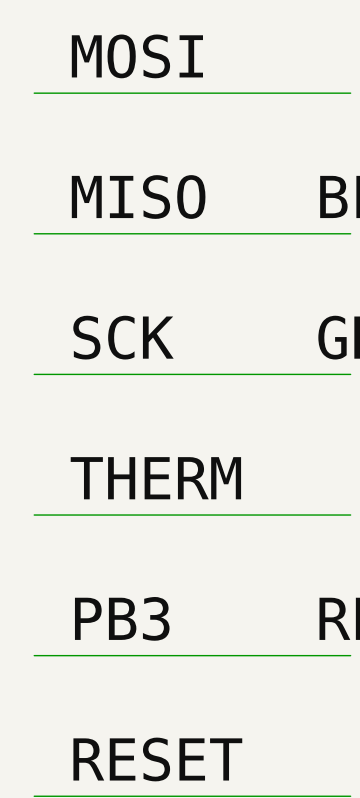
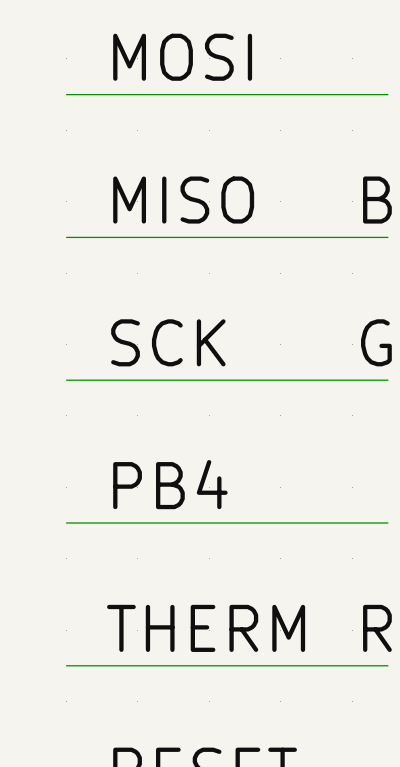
label: THERM (155, 478) -> PB4 (170, 484)
label: PB3 (122, 618) -> THERM (206, 628)

